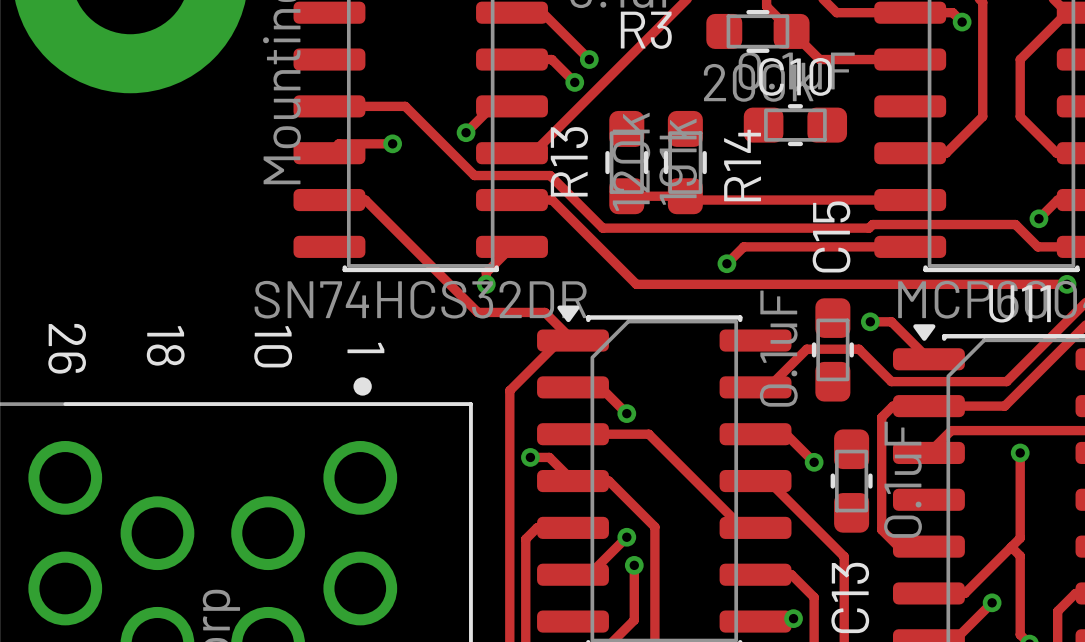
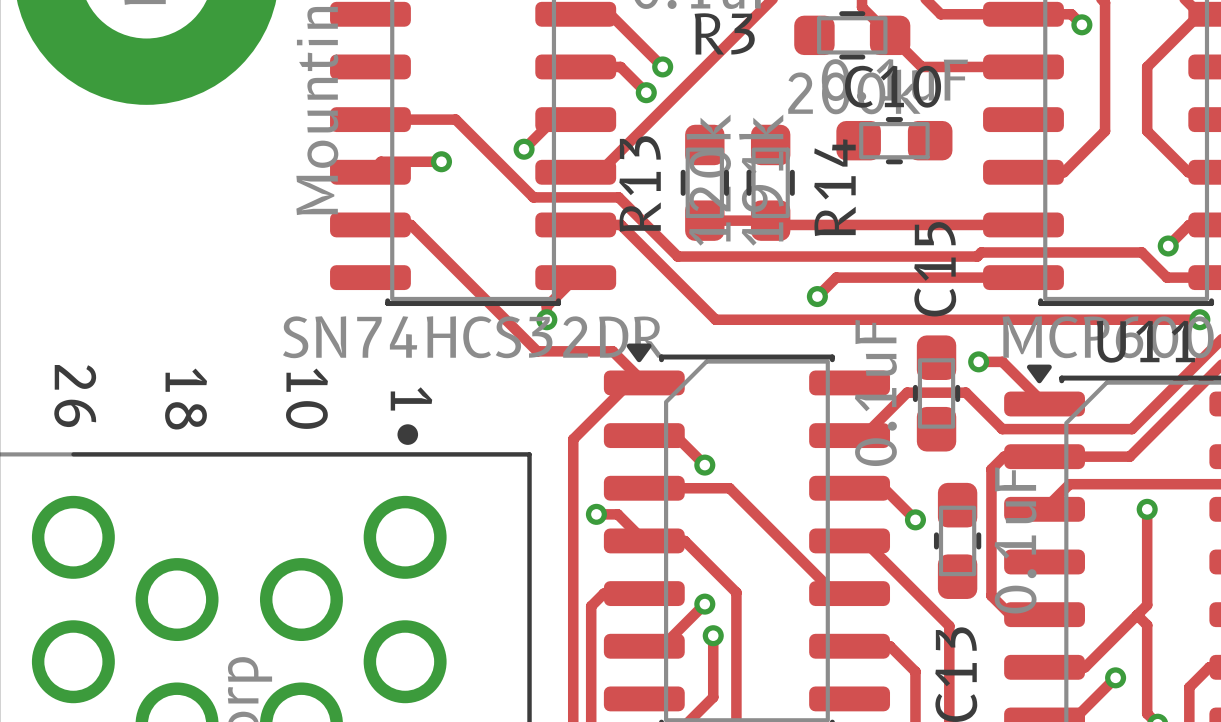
via: (793, 618) -> none

